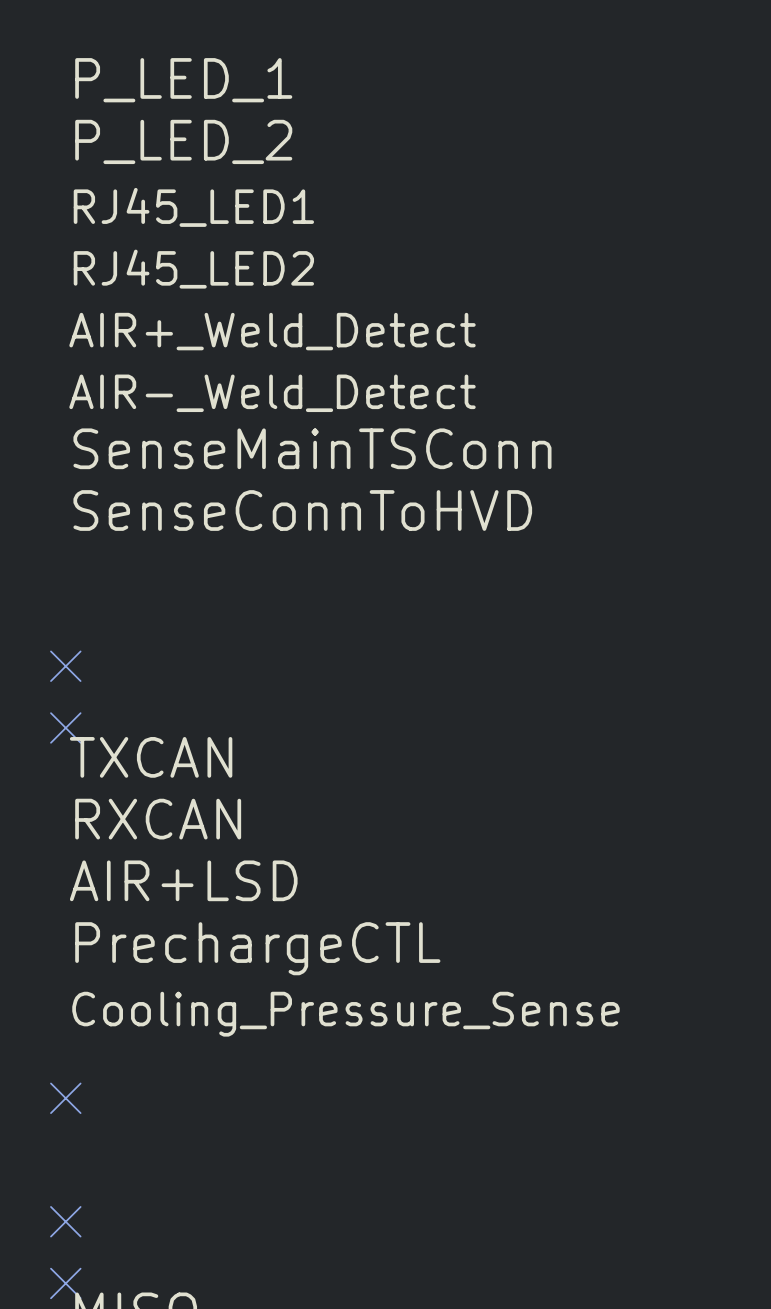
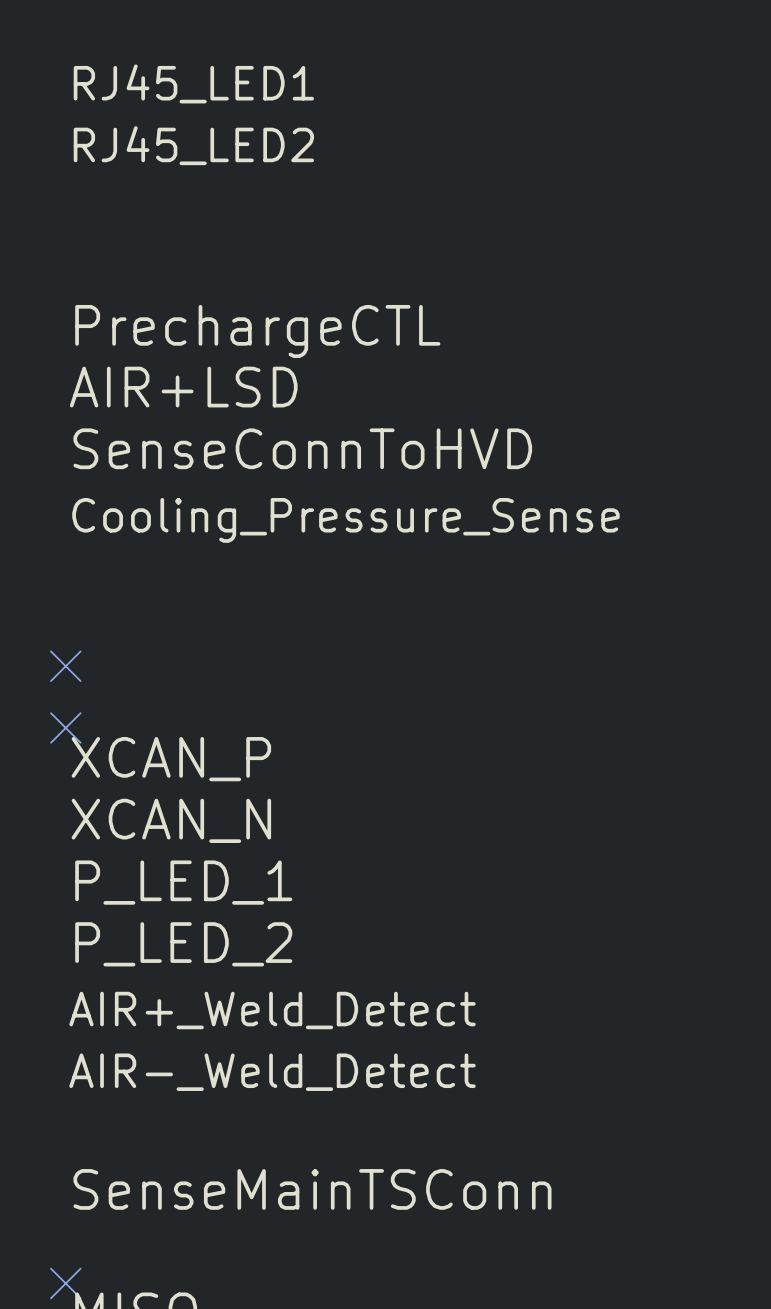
label: P_LED_1 (183, 80) -> RJ45_LED1 (193, 83)
label: P_LED_2 (183, 141) -> RJ45_LED2 (193, 145)
label: RJ45_LED1 (193, 207) -> none
label: RJ45_LED2 (193, 269) -> none
label: AIR+_Weld_Detect (272, 331) -> PrechargeCTL (257, 331)
label: AIR-_Weld_Detect (272, 393) -> AIR+LSD (183, 387)
label: SenseMainTSConn (312, 448) -> SenseConnToHVD (302, 448)
label: SenseConnToHVD (302, 510) -> Cooling_Pressure_Sense (345, 520)
label: TXCAN (151, 757) -> XCAN_P (171, 759)
label: RXCAN (158, 819) -> XCAN_N (171, 820)
label: AIR+LSD (183, 880) -> P_LED_1 (183, 882)
label: PrechargeCTL (257, 948) -> P_LED_2 (183, 944)
label: Cooling_Pressure_Sense (345, 1014) -> AIR+_Weld_Detect (272, 1010)
label: none -> AIR-_Weld_Detect (272, 1072)
no-connect mark: (65, 1098) -> none
label: none -> SenseMainTSConn (312, 1189)
no-connect mark: (65, 1221) -> none

